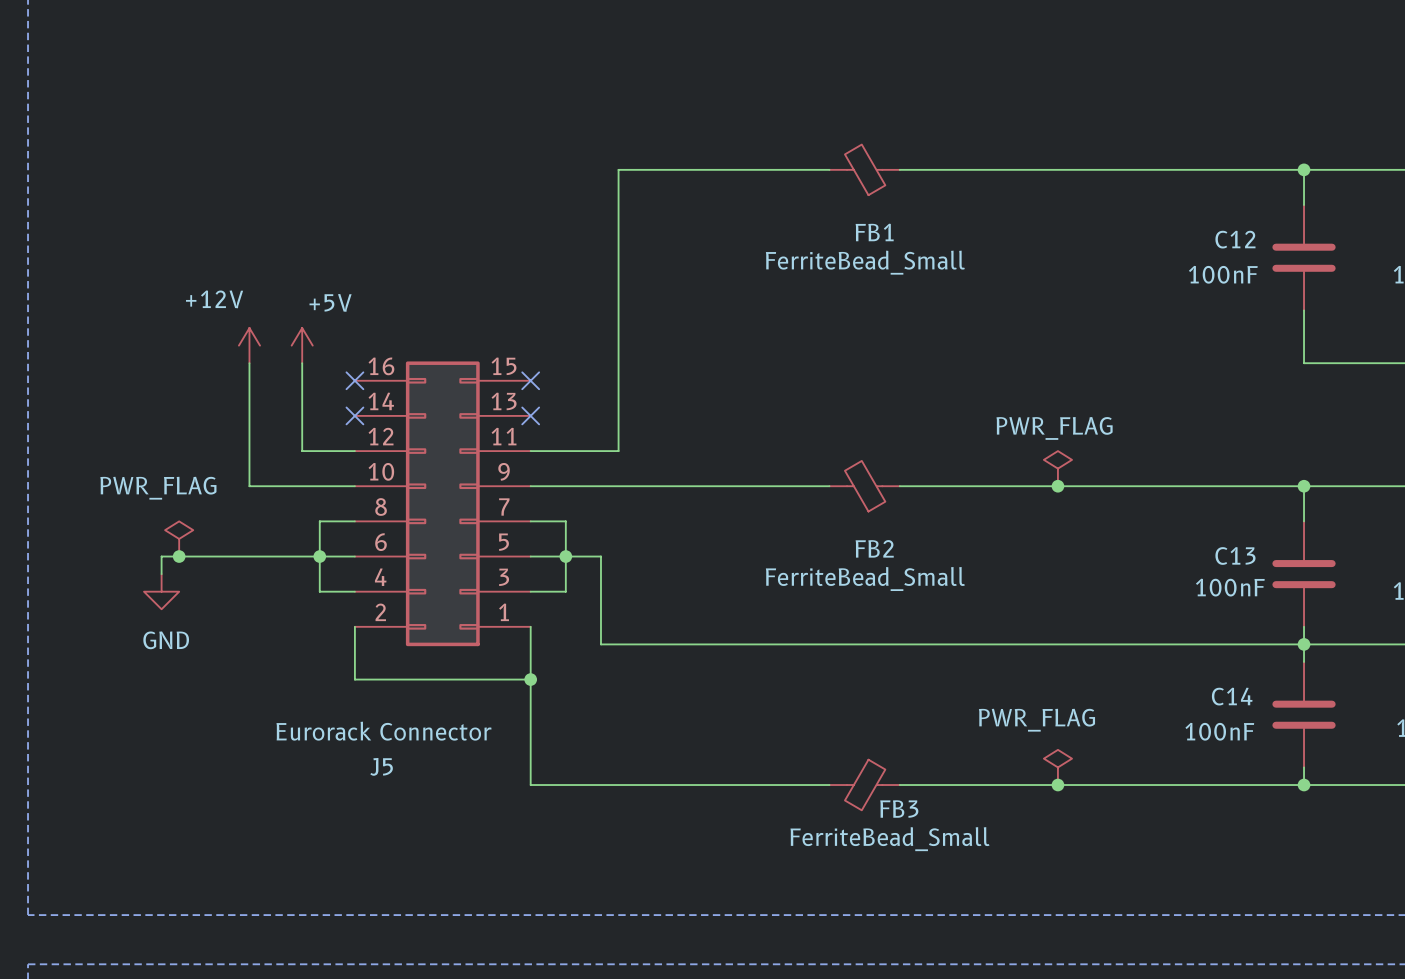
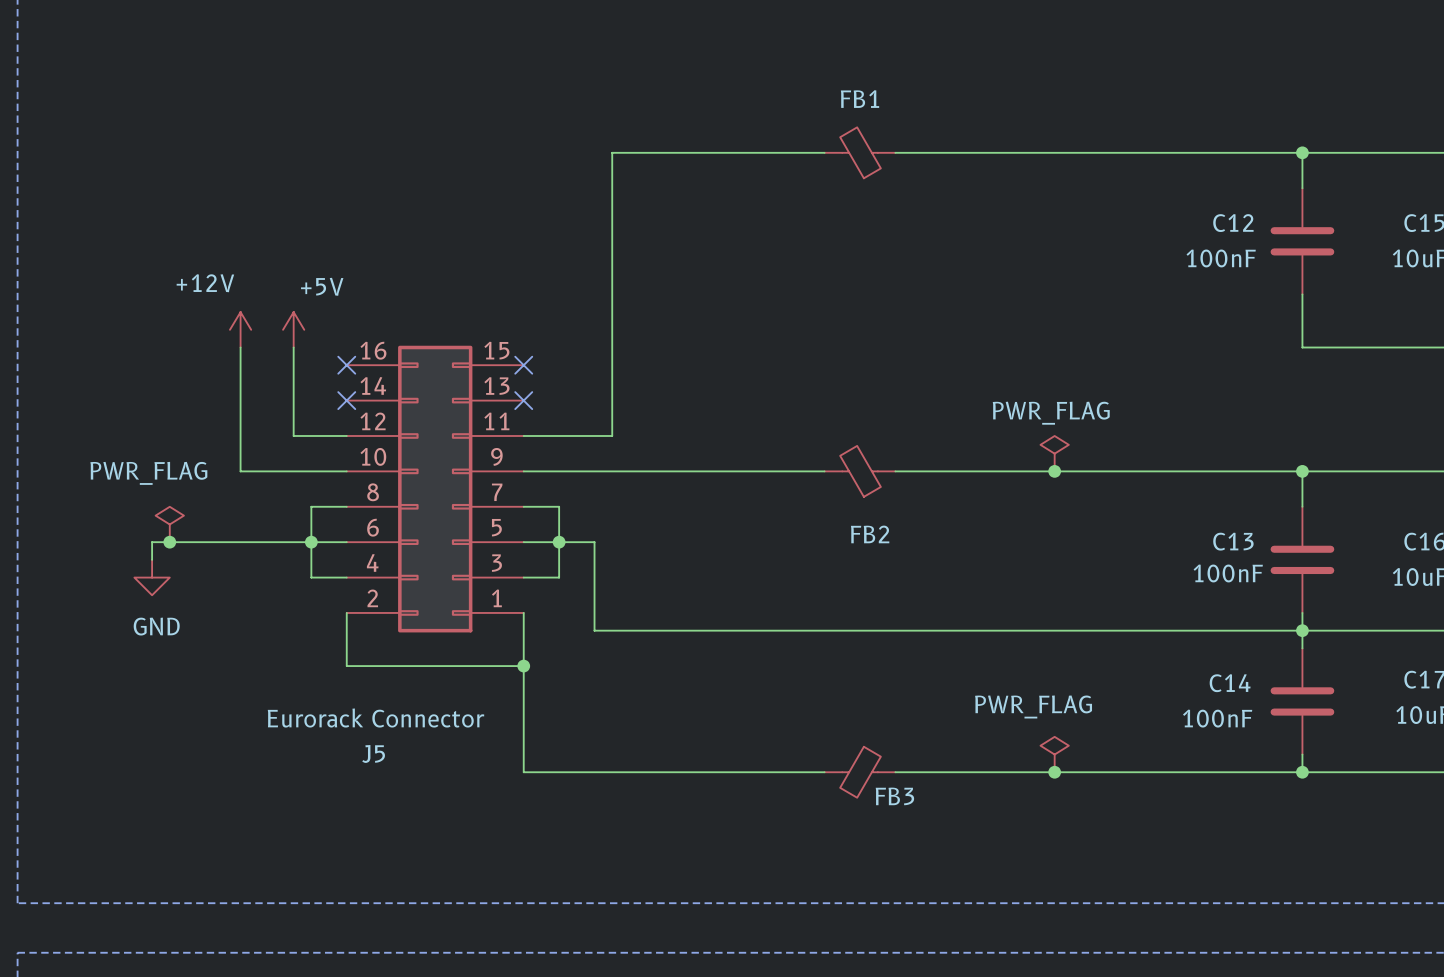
FB1 name position: FB1 (874, 232) -> FB1 (860, 99)
FB1 value: FerriteBead_Small (865, 262) -> none
FB2 value: FerriteBead_Small (865, 579) -> none
FB3 value: FerriteBead_Small (889, 839) -> none

